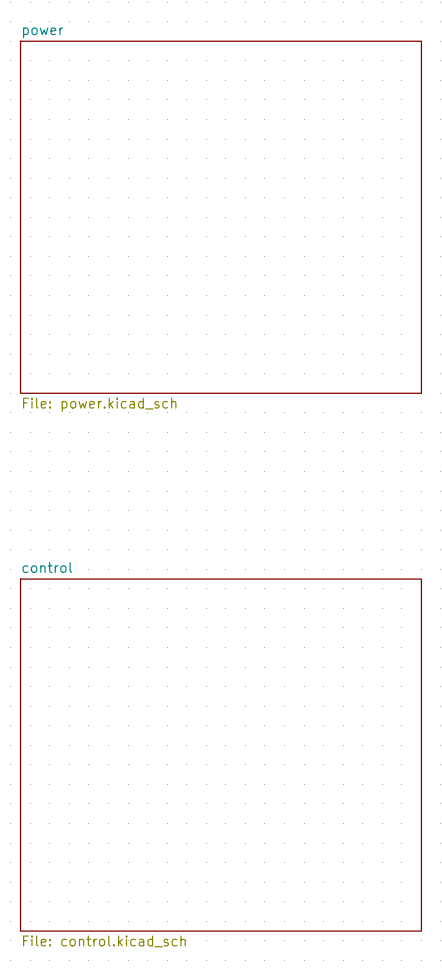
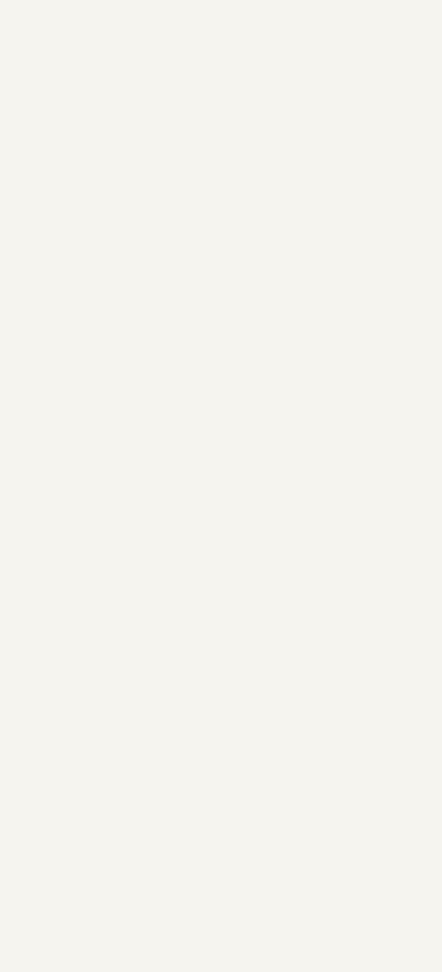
sheet power: File: power.kicad_sch (220, 217) -> none
sheet control: File: control.kicad_sch (220, 755) -> none

